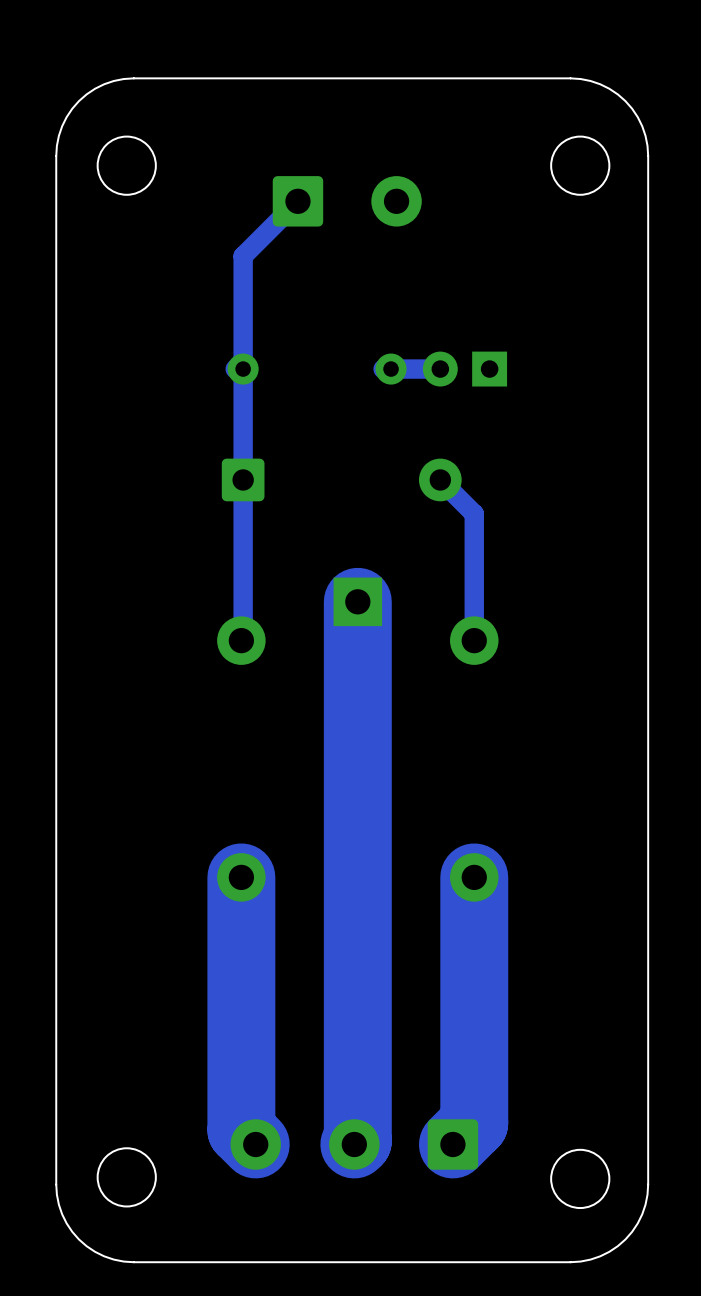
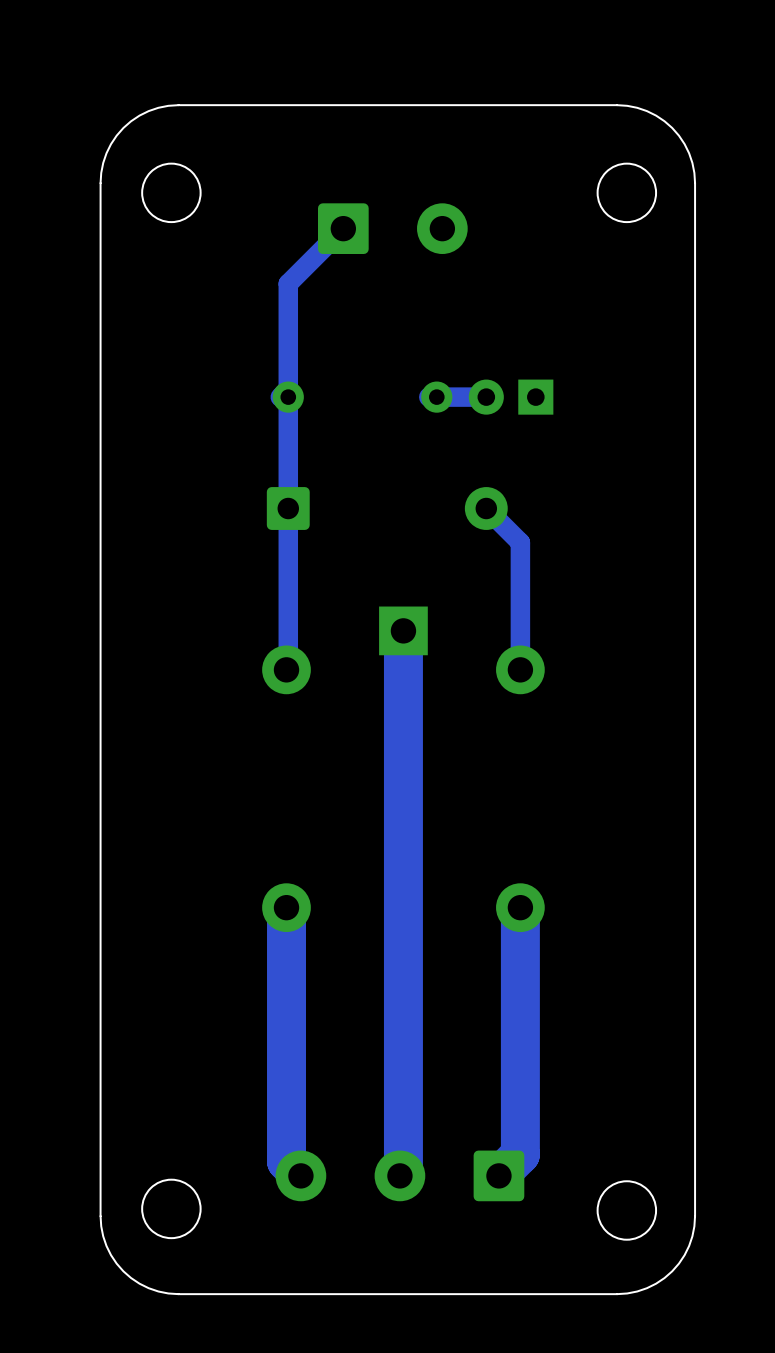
bottom track width: thick (357, 601) (357, 1141) (354, 1144) -> thin (403, 630) (403, 1172) (399, 1175)
bottom track width: thick (241, 877) (241, 1130) (255, 1144) -> thin (286, 907) (286, 1161) (300, 1175)
bottom track width: thick (474, 877) (474, 1123) (452, 1144) -> thin (520, 907) (520, 1154) (498, 1175)

